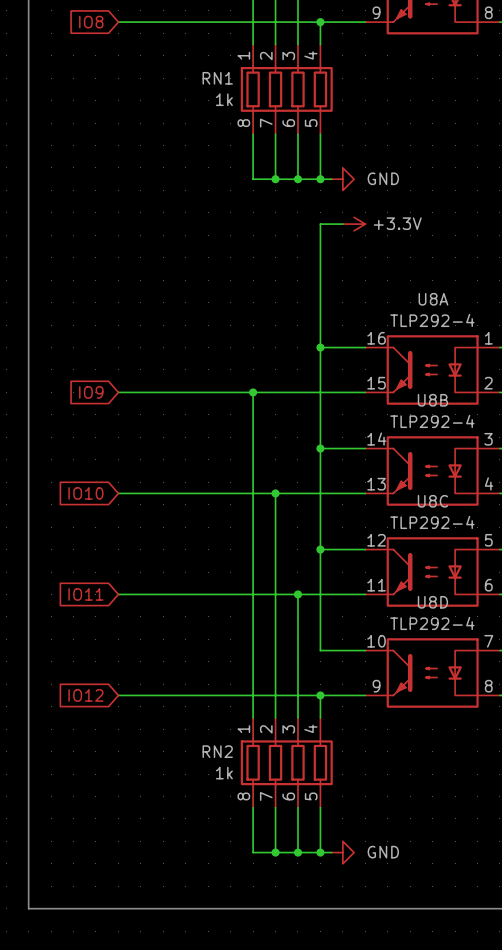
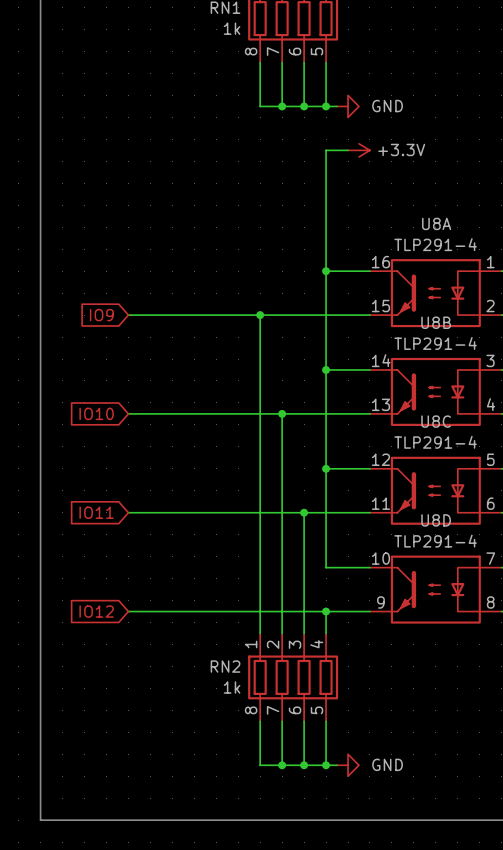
U8A value: TLP292-4 (432, 320) -> TLP291-4 (435, 244)
U8B value: TLP292-4 (432, 421) -> TLP291-4 (435, 343)
U8C value: TLP292-4 (432, 522) -> TLP291-4 (435, 442)
U8D value: TLP292-4 (432, 623) -> TLP291-4 (435, 541)

